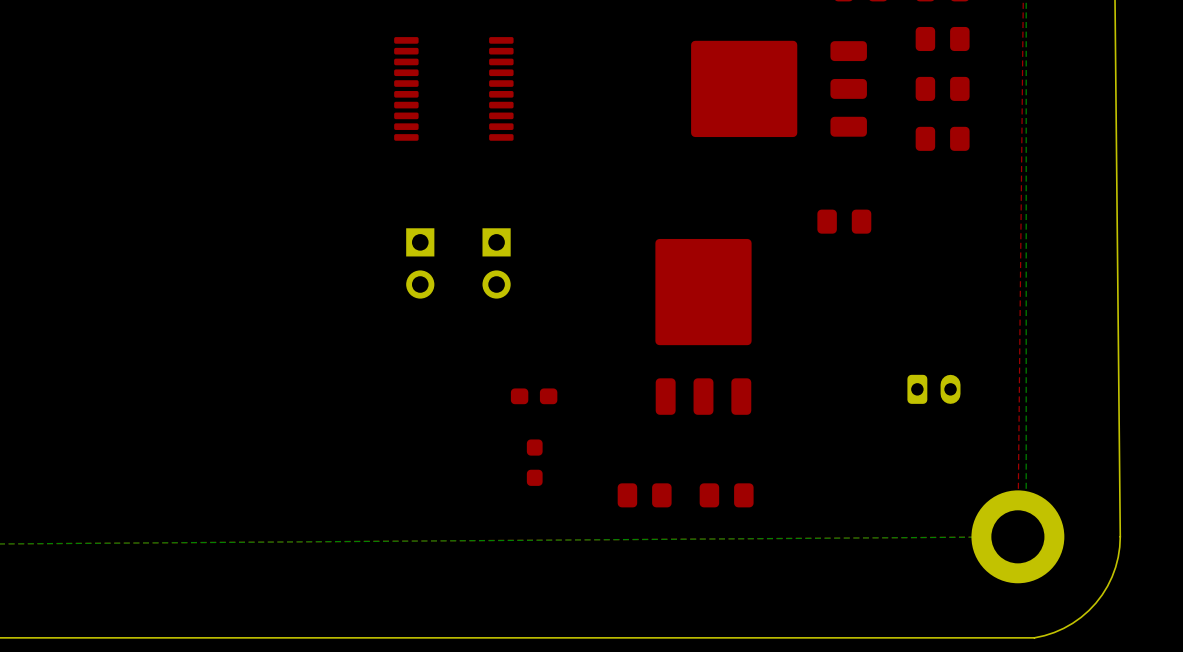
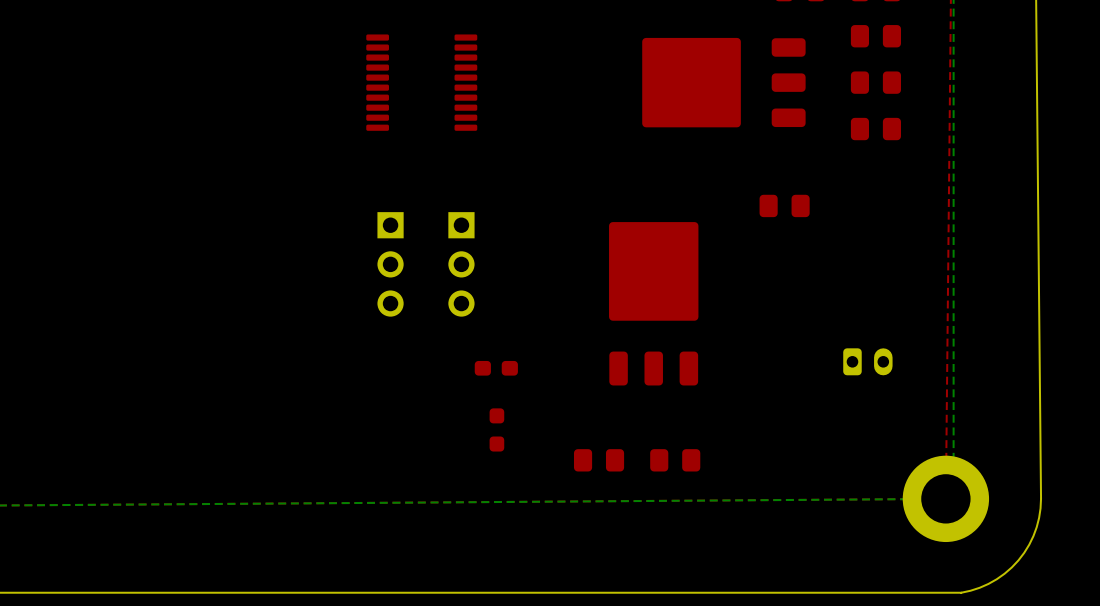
part: none -> (390, 264)
part: none -> (461, 264)

